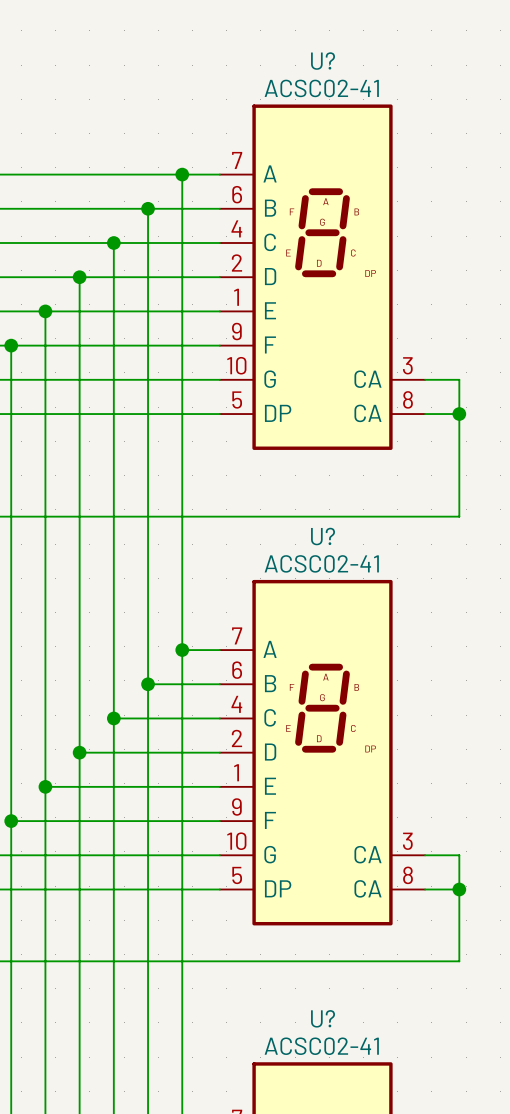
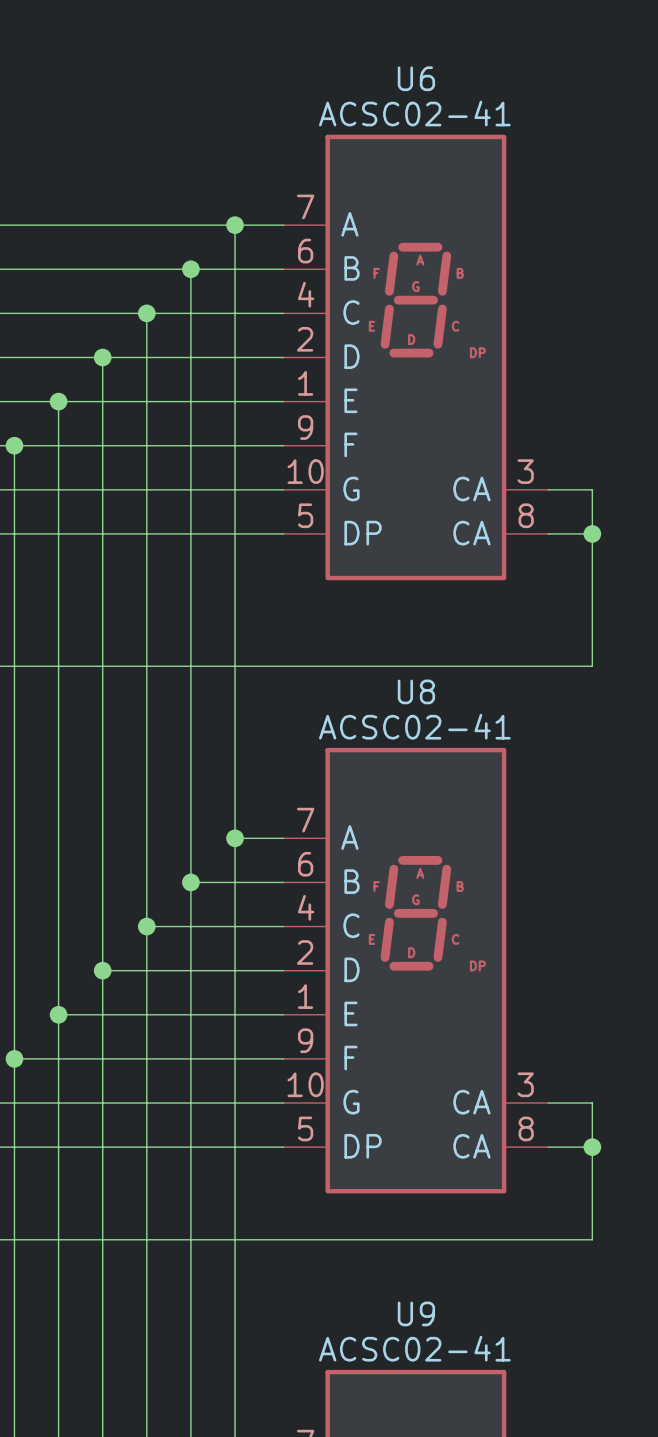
U? name: U? (323, 61) -> U6 (416, 78)
U? name: U? (323, 536) -> U8 (416, 691)
U? name: U? (323, 1018) -> U9 (416, 1313)

